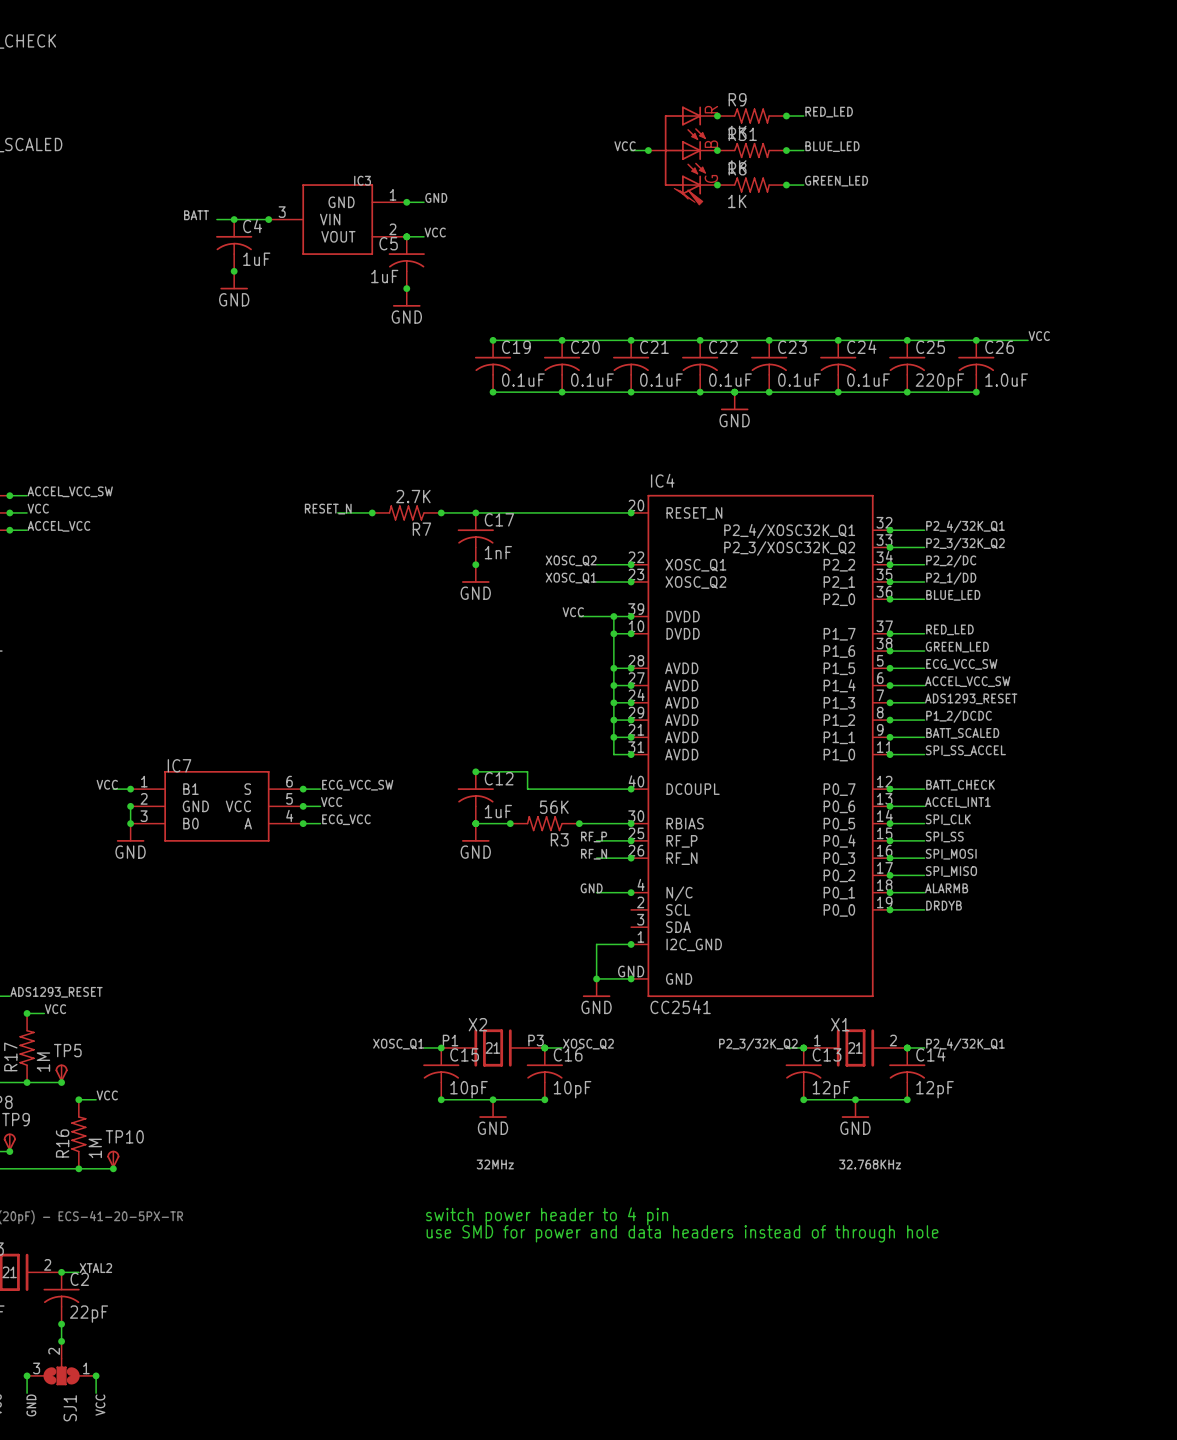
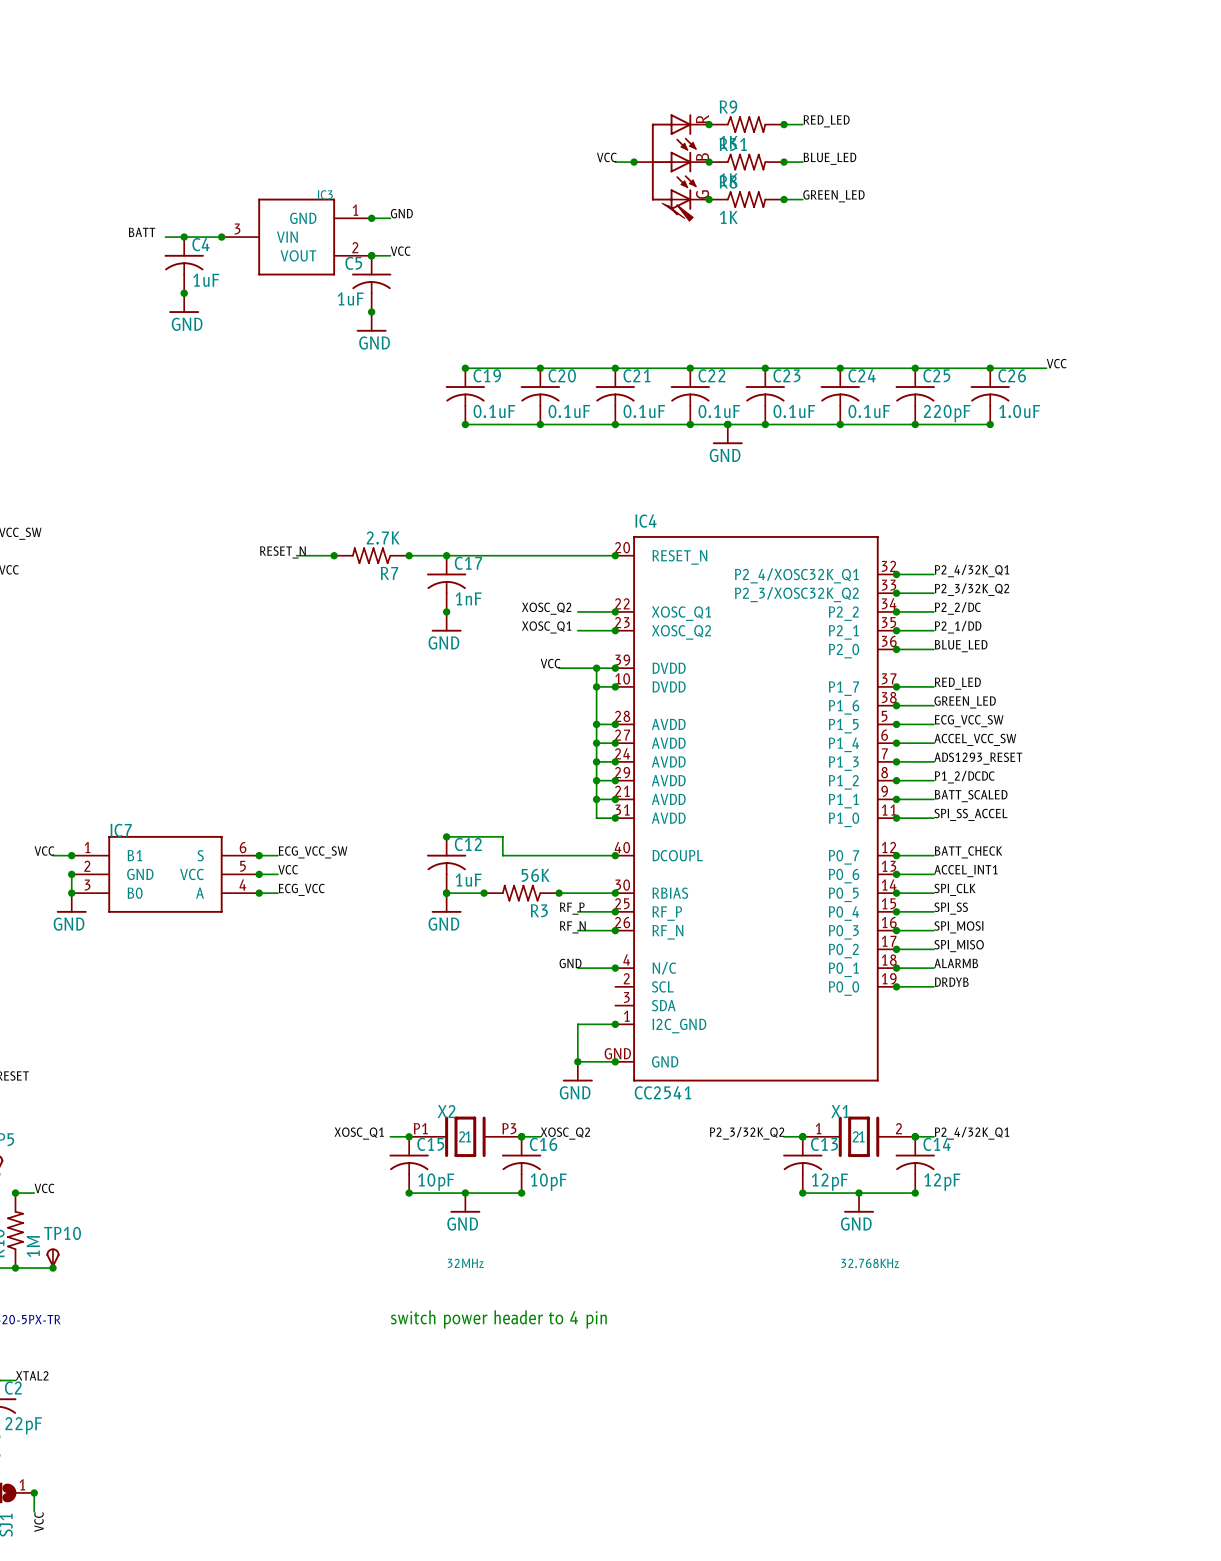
text: use SMD for power and data headers instead of through hole (682, 1233) -> none

